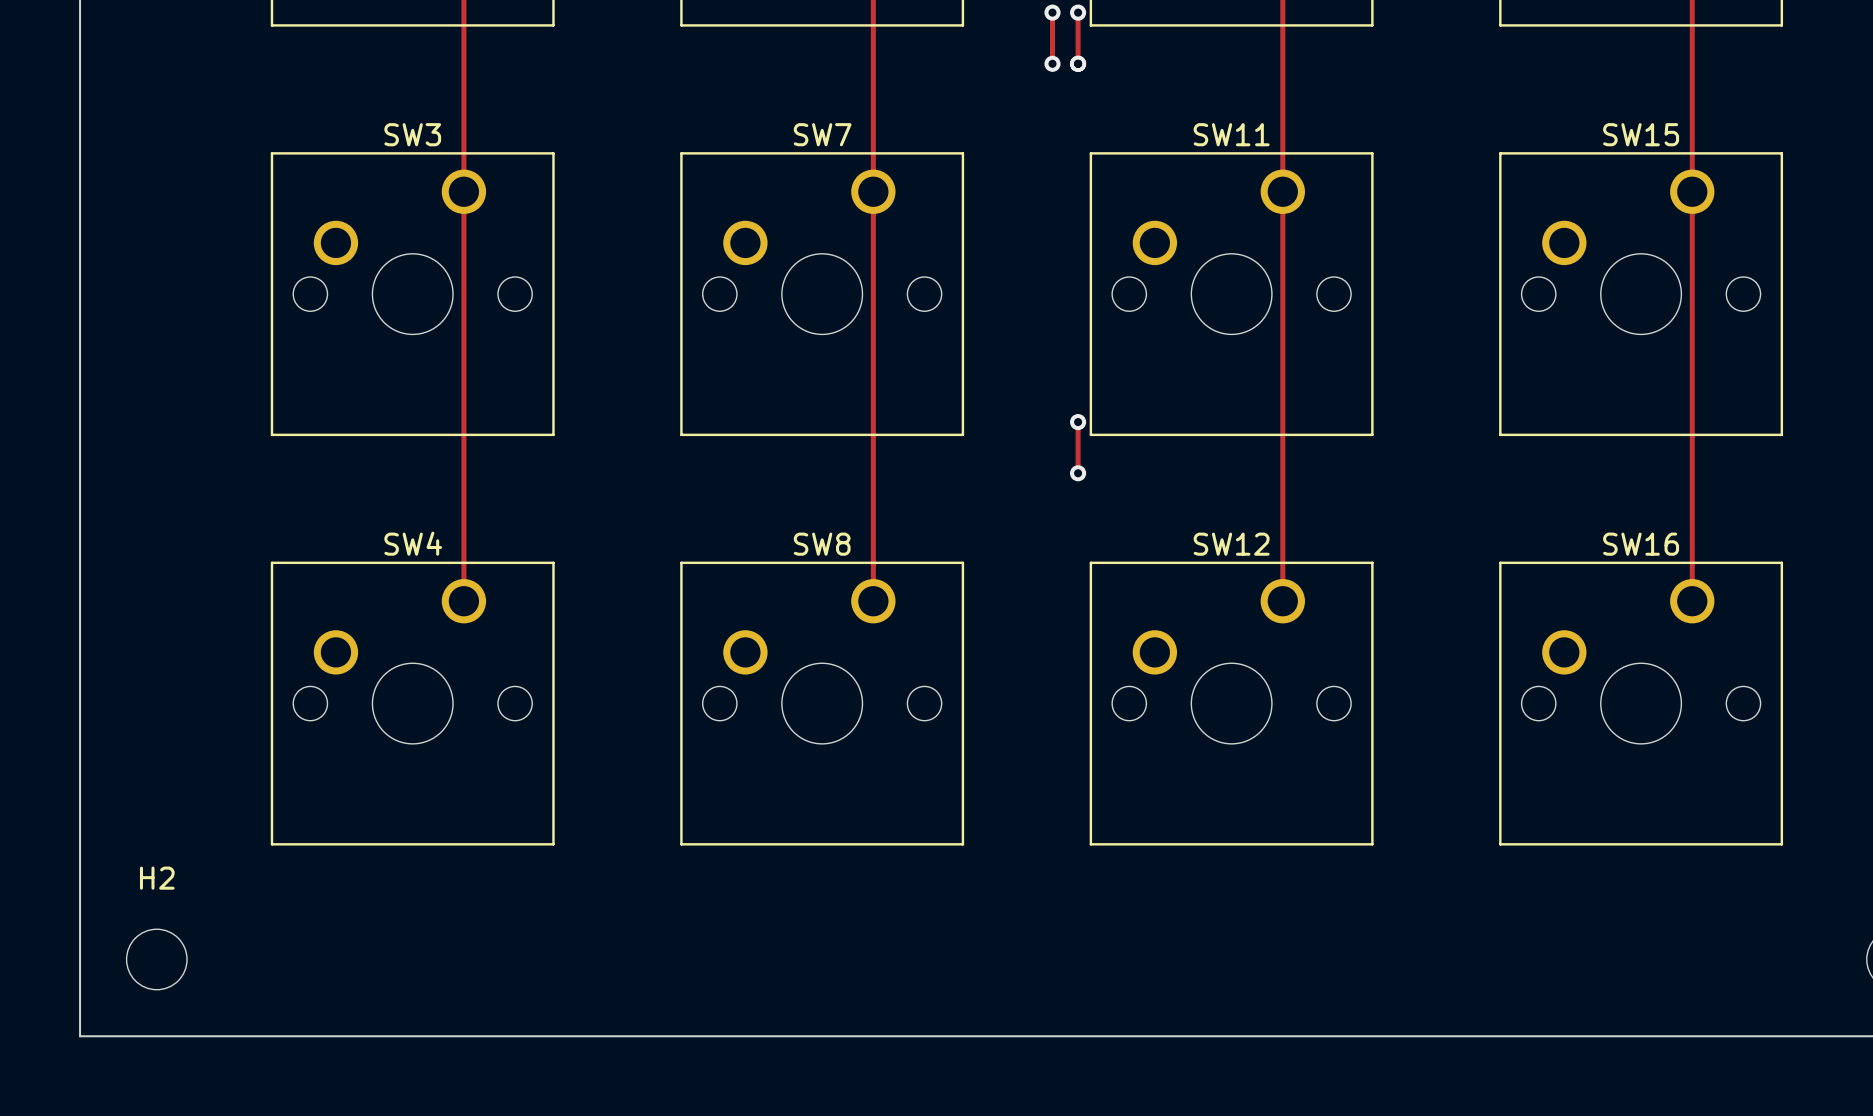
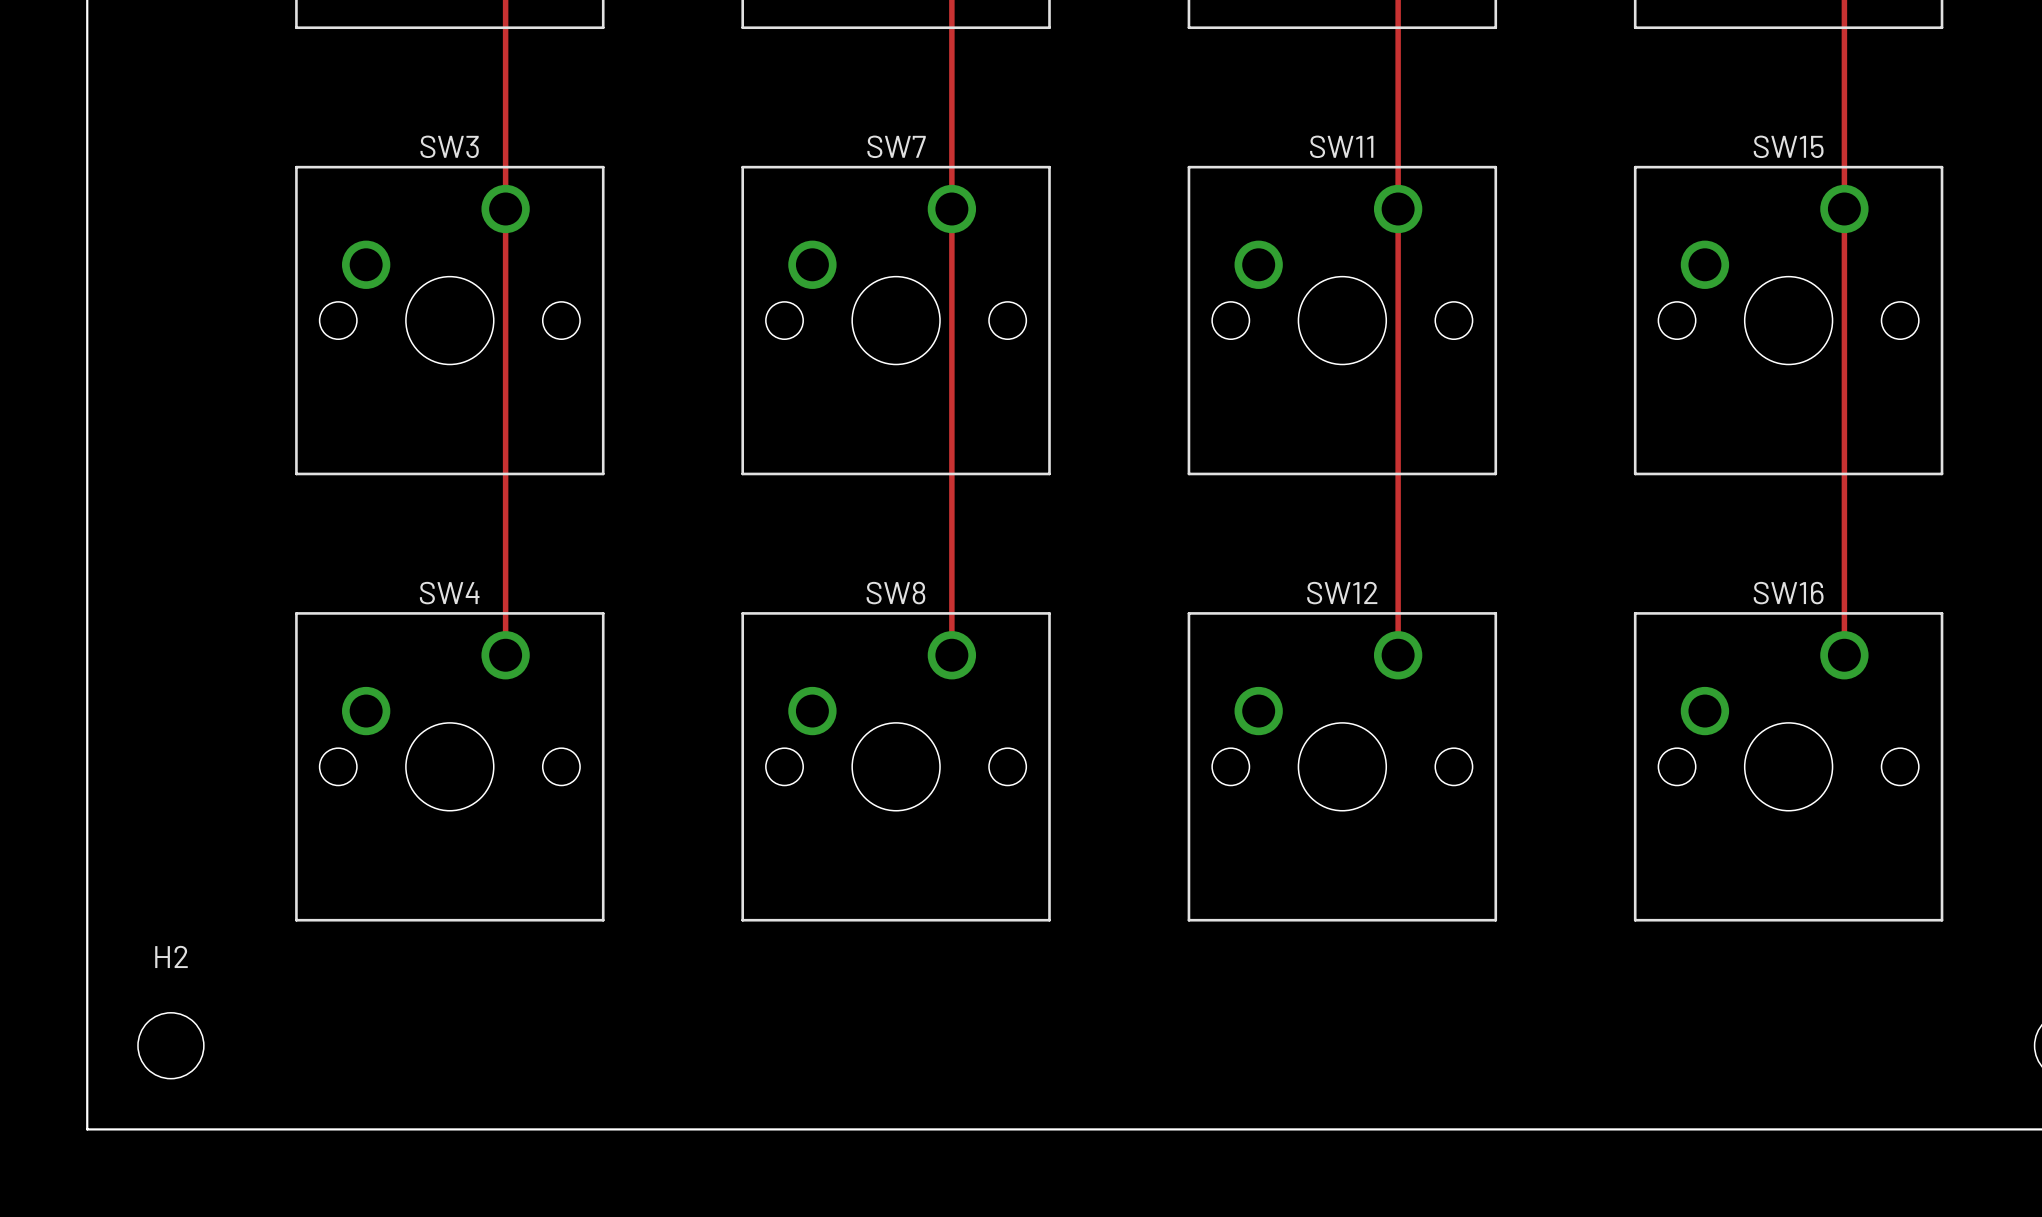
track: (1052, 12) (1052, 63) -> none
via: (1052, 12) -> none
track: (1078, 12) (1078, 63) -> none
via: (1078, 12) -> none
via: (1052, 63) -> none
via: (1078, 63) -> none
track: (1078, 422) (1078, 473) -> none
via: (1078, 422) -> none
via: (1078, 473) -> none

